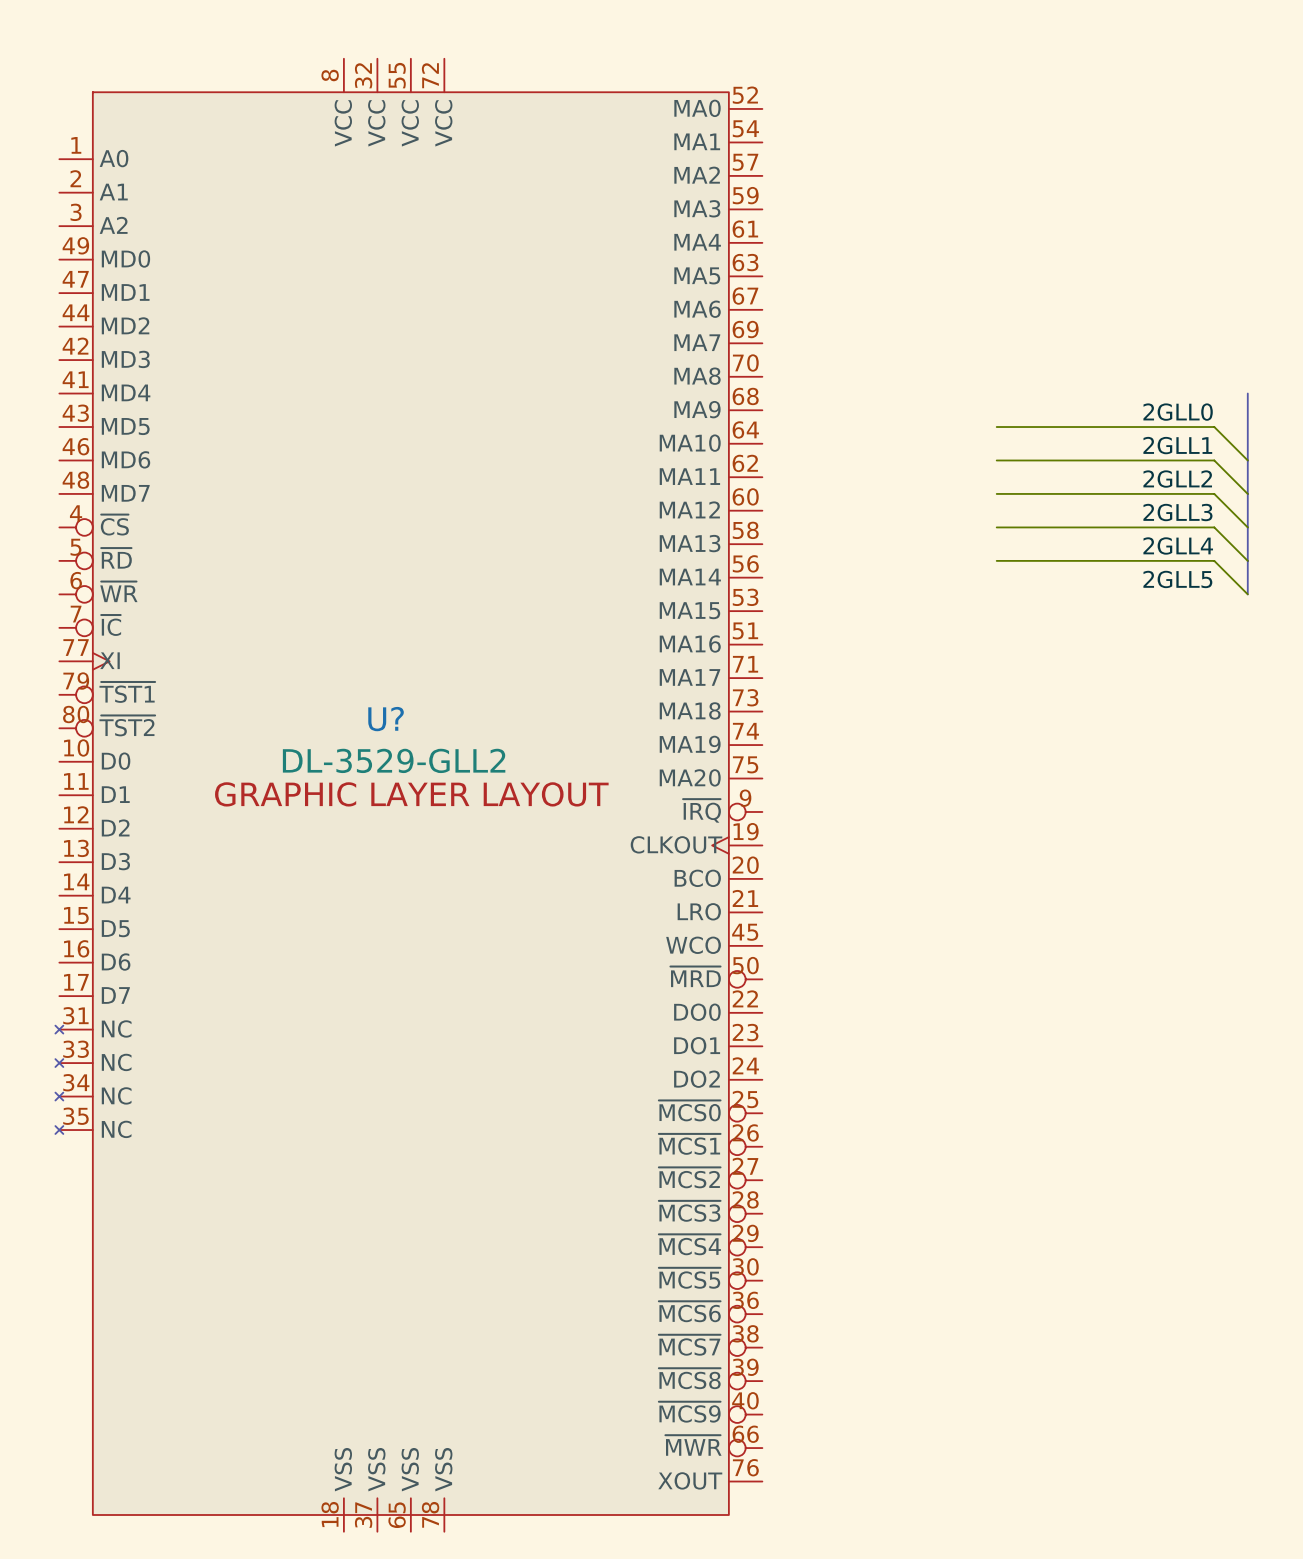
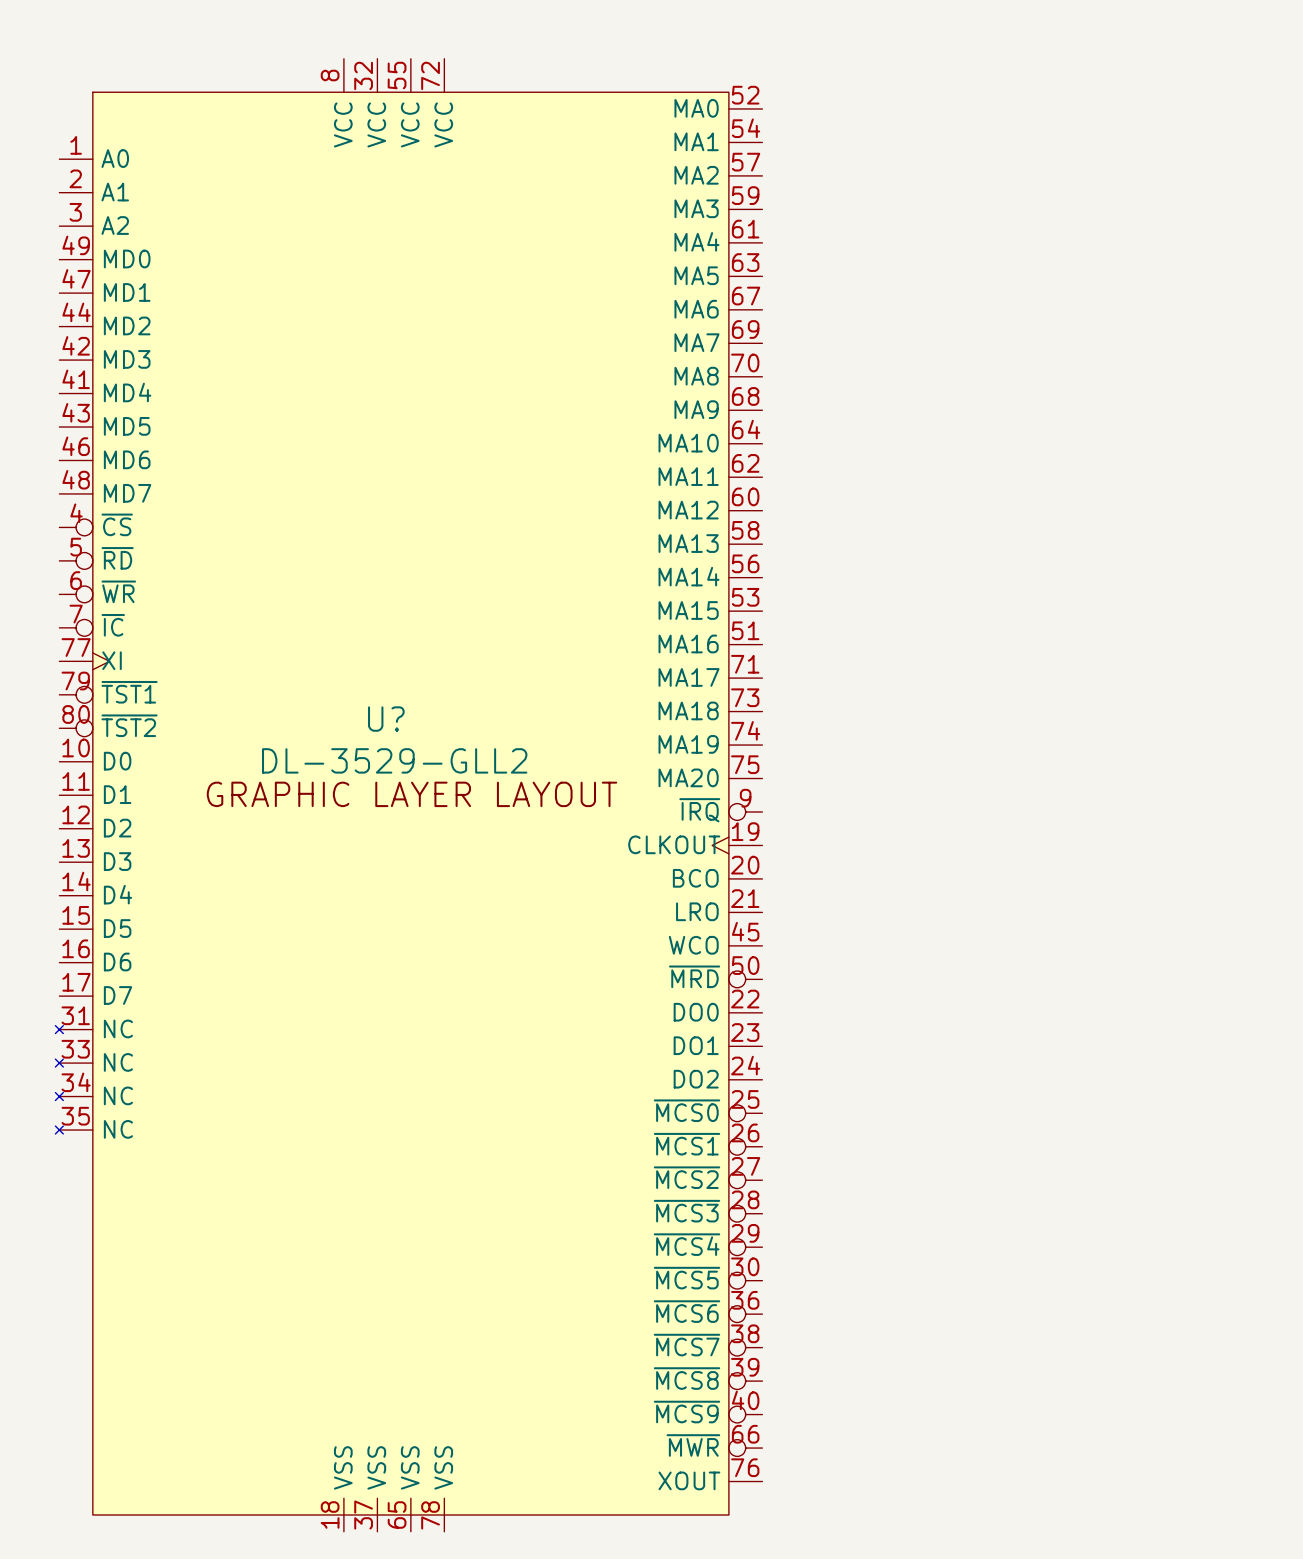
bus: (1247, 393) (1247, 594) -> none
label: 2GLL0 (1178, 412) -> none
wire: (996, 427) (1214, 427) (1247, 460) -> none
label: 2GLL1 (1177, 445) -> none
wire: (996, 460) (1214, 460) (1247, 493) -> none
label: 2GLL2 (1177, 479) -> none
wire: (996, 493) (1214, 493) (1247, 527) -> none
label: 2GLL3 (1177, 512) -> none
wire: (996, 527) (1214, 527) (1247, 560) -> none
label: 2GLL4 (1178, 545) -> none
wire: (996, 560) (1214, 560) (1247, 594) -> none
label: 2GLL5 (1177, 579) -> none

